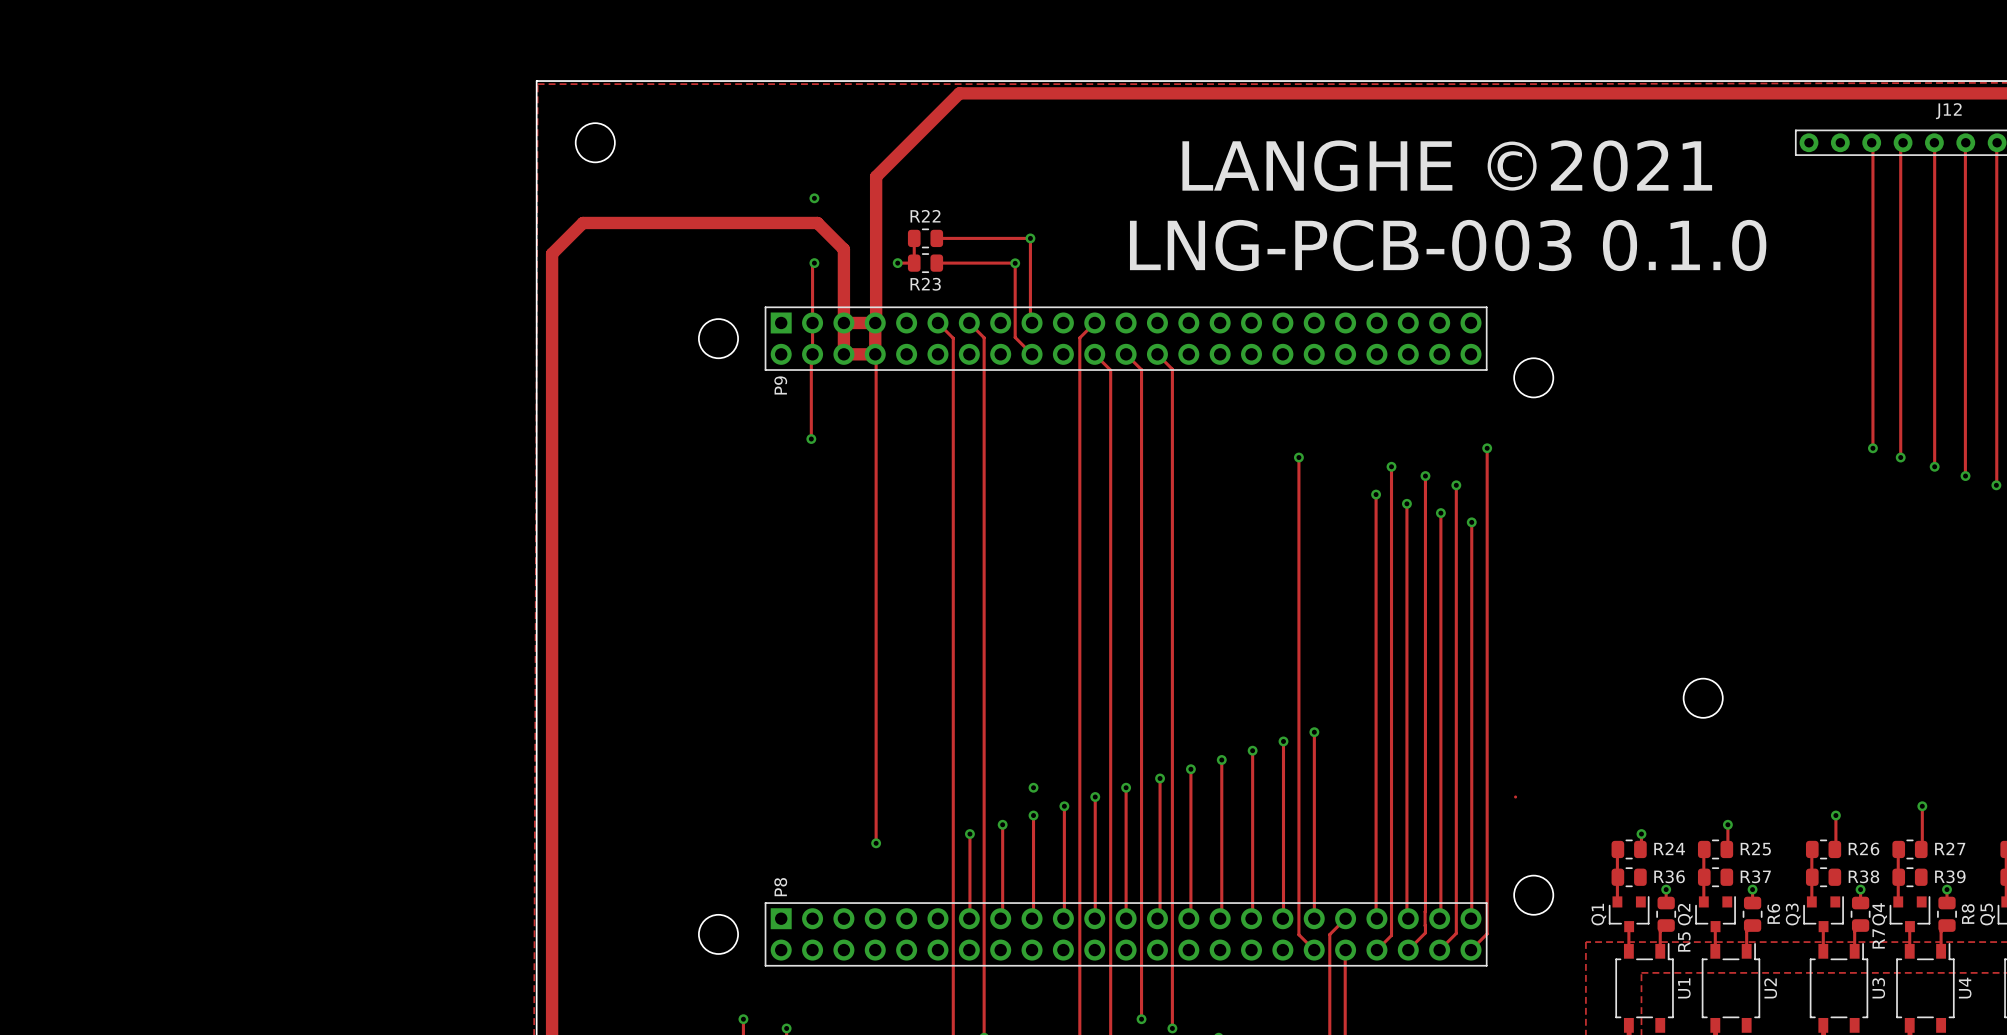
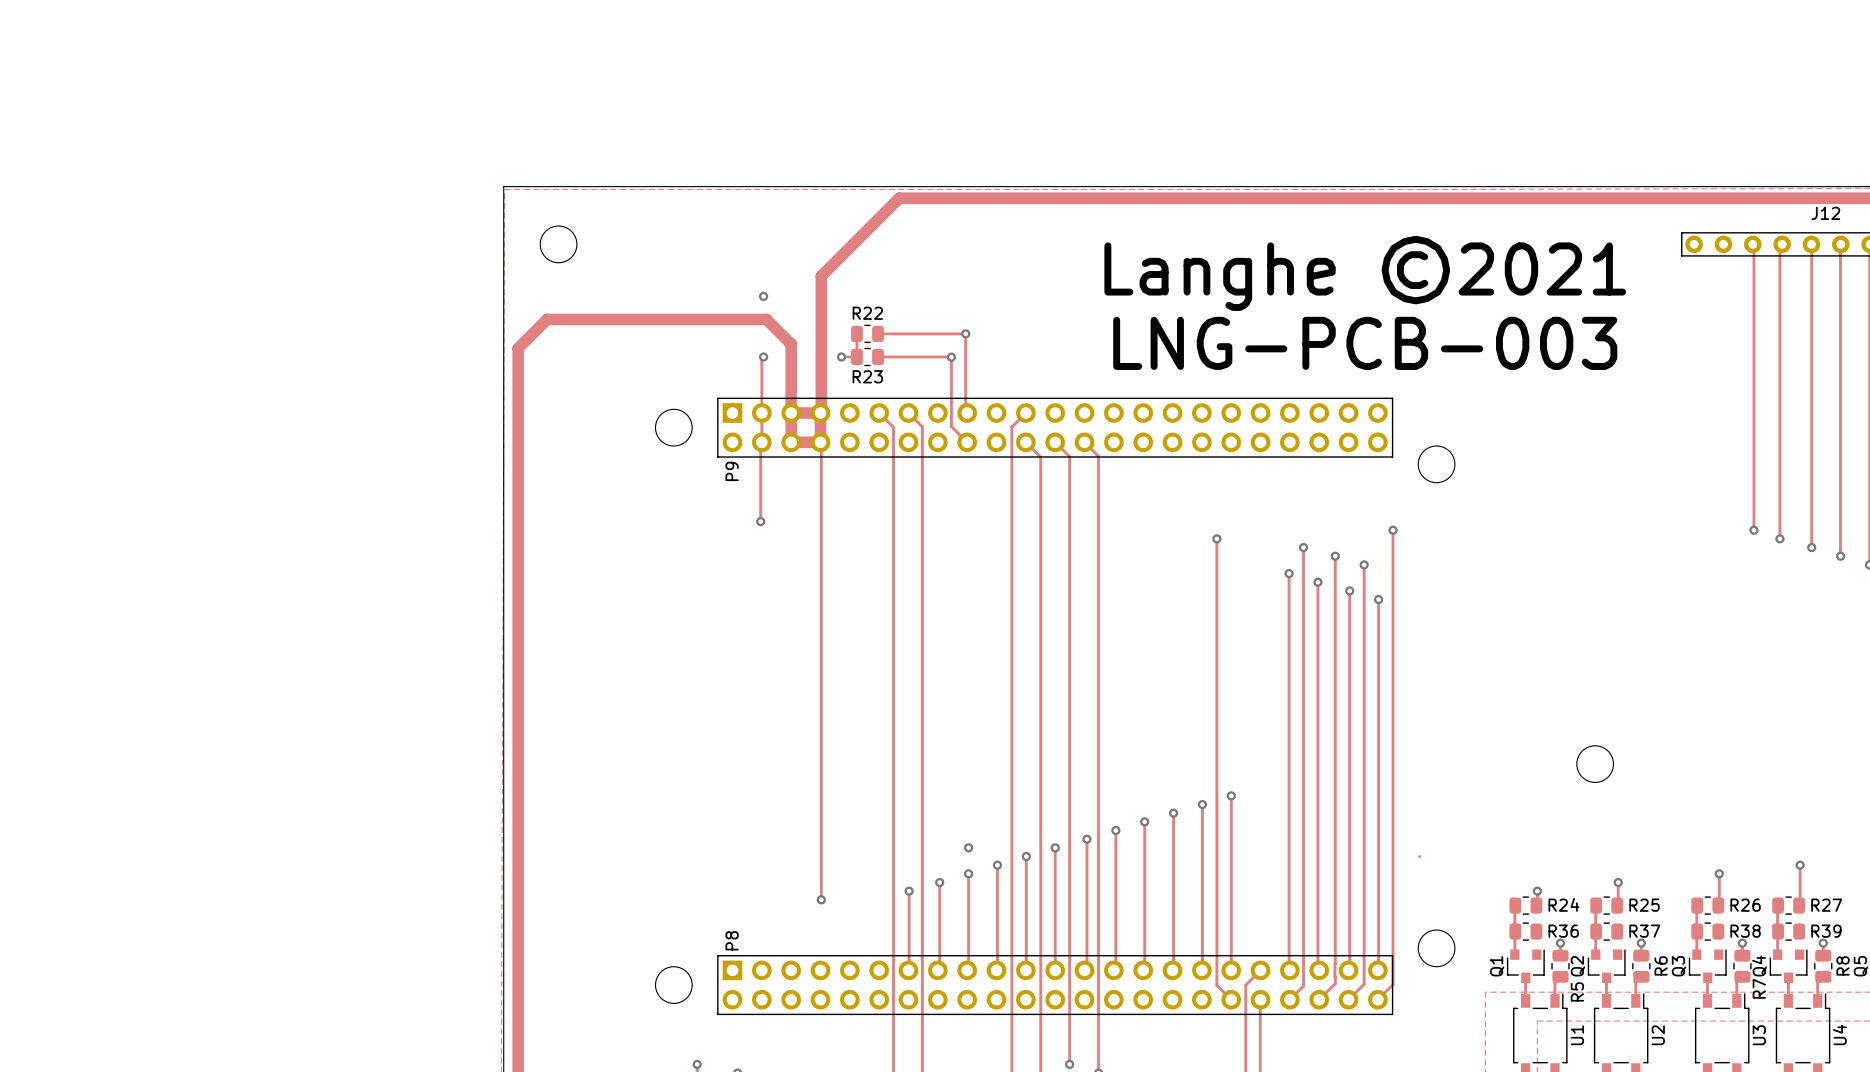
text: LANGHE ©2021 (1447, 166) -> Langhe ©2021 (1365, 273)
text: LNG-PCB-003 0.1.0 (1448, 245) -> LNG-PCB-003 (1365, 343)

